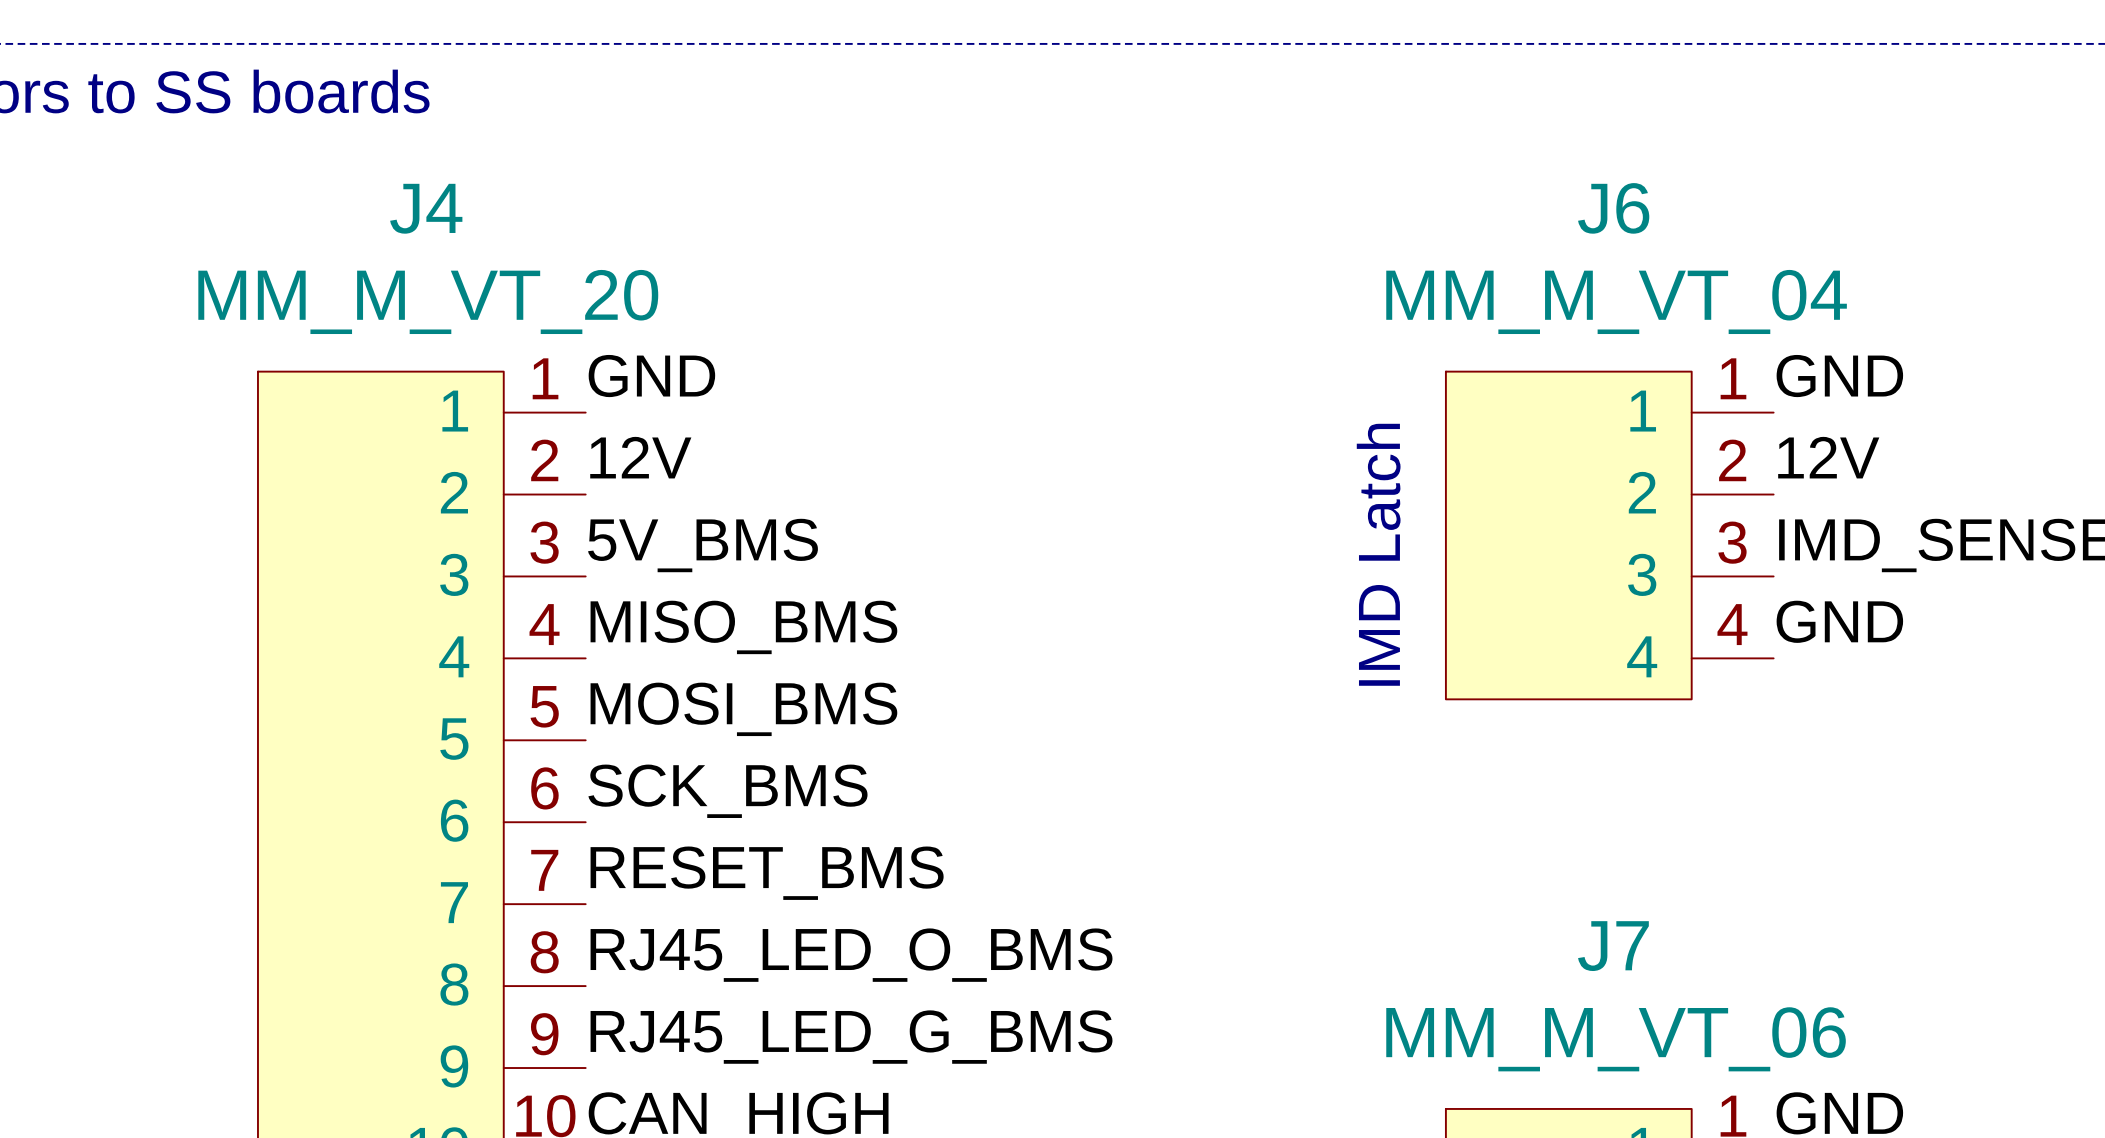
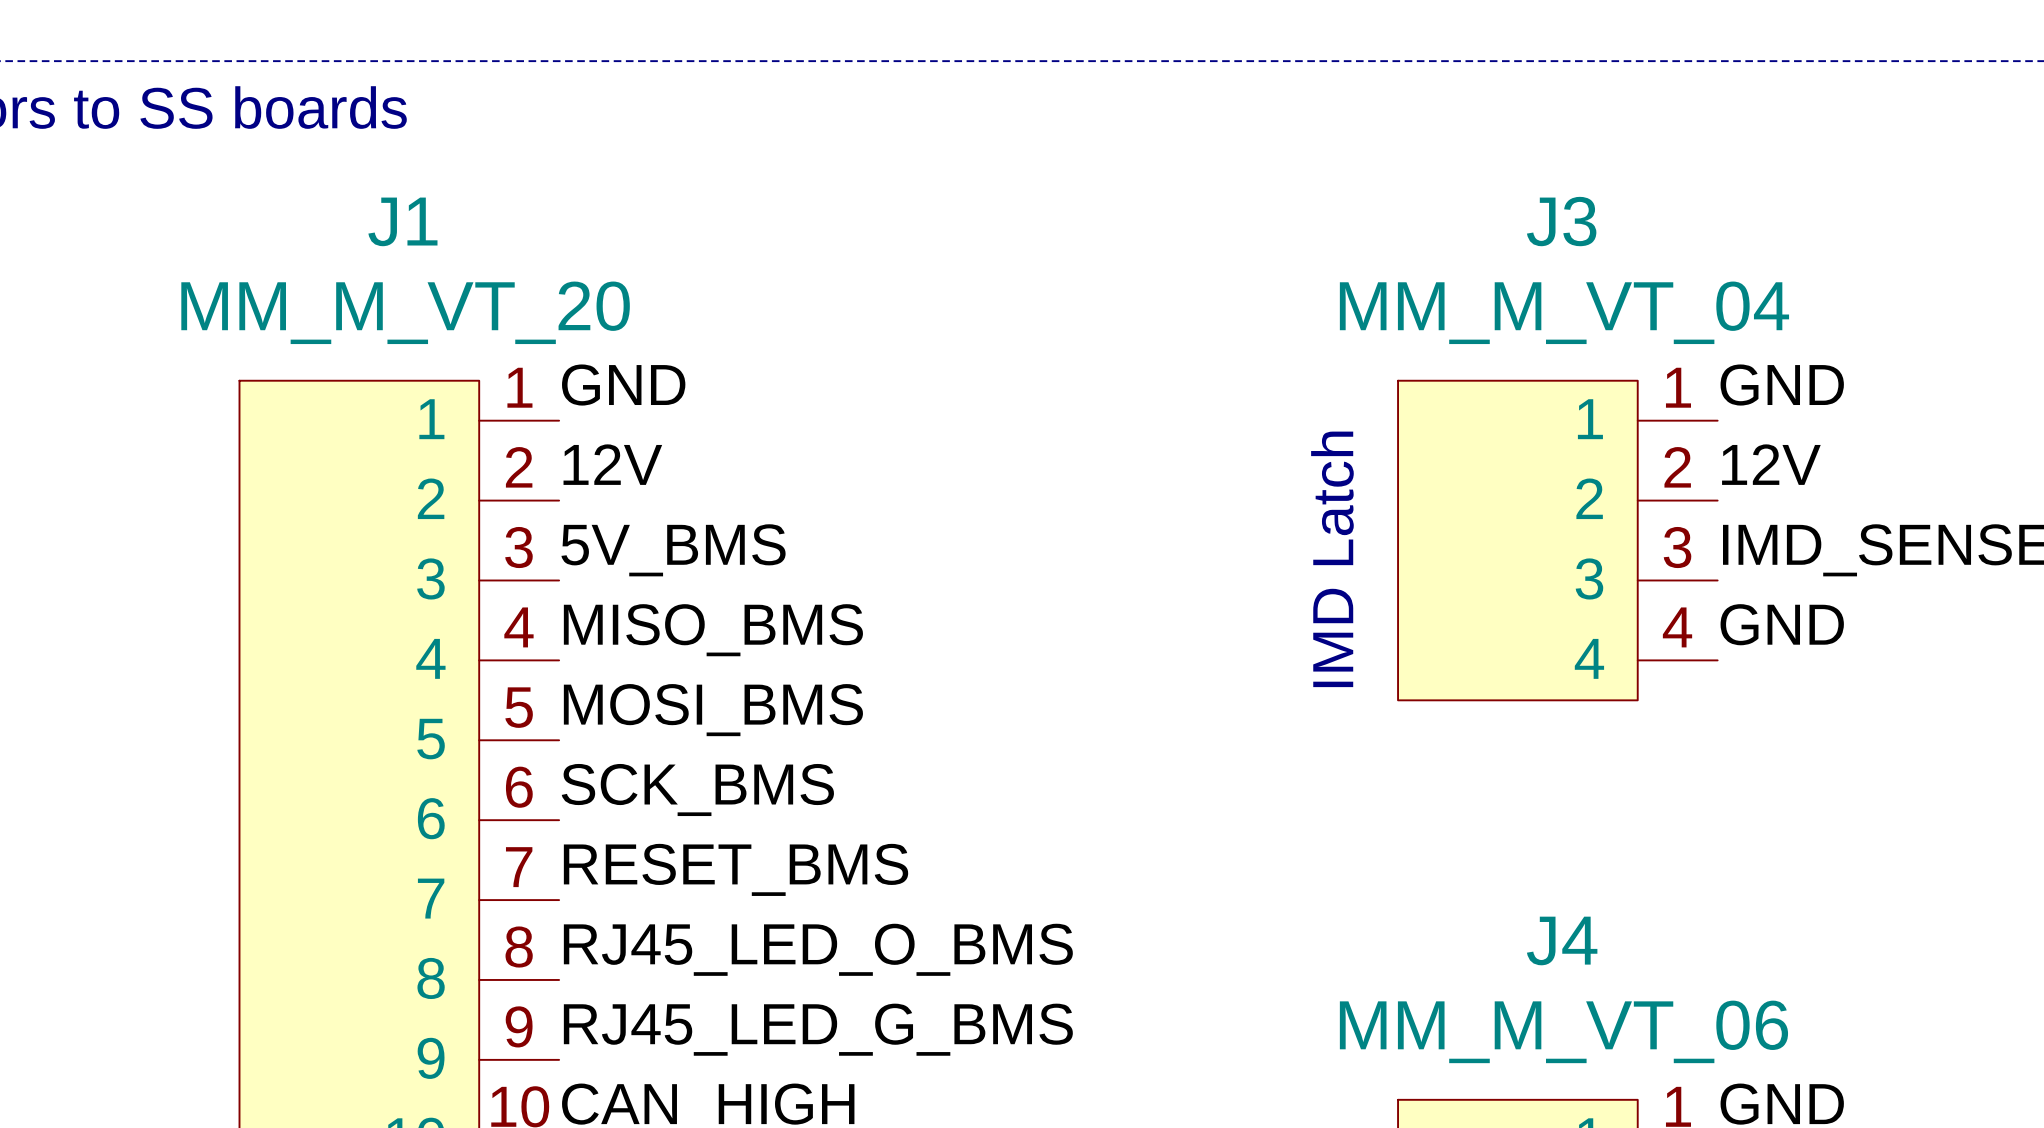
J4 name: J4 (426, 208) -> J1 (402, 221)
J6 name: J6 (1613, 208) -> J3 (1561, 221)
J7 name: J7 (1613, 946) -> J4 (1562, 940)

